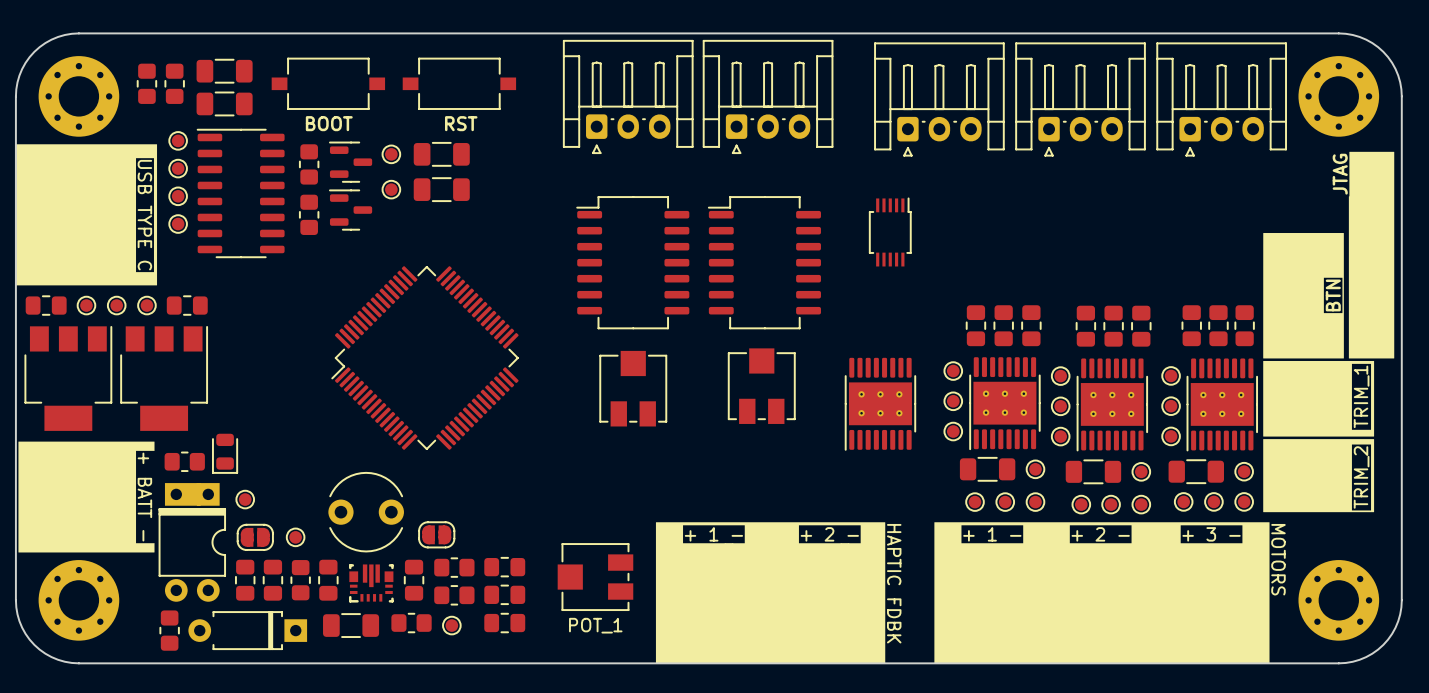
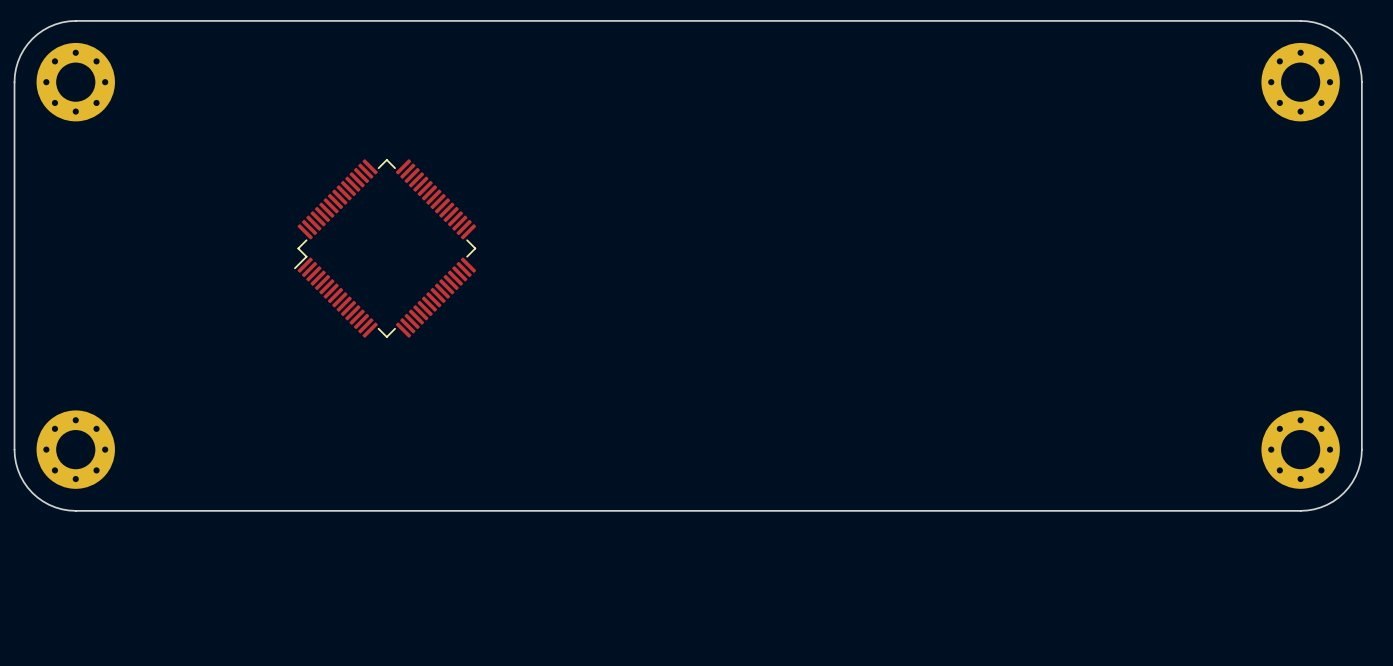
part: (224, 71) -> none
part: (146, 83) -> none
part: (174, 83) -> none
part: (328, 83) -> none
part: (459, 83) -> none
part: (628, 96) -> none
part: (768, 96) -> none
part: (939, 99) -> none
part: (1080, 99) -> none
part: (1221, 99) -> none
part: (224, 103) -> none
text: BOOT (329, 123) -> none
text: RST (461, 123) -> none
part: (178, 140) -> none
drawing: [15, 144, 158, 286] -> none
drawing: [934, 151, 1395, 664] -> none
part: (391, 154) -> none
part: (441, 154) -> none
part: (350, 162) -> none
part: (309, 164) -> none
part: (178, 168) -> none
text: JTAG (1340, 174) -> none
part: (391, 189) -> none
part: (441, 189) -> none
part: (240, 193) -> none
part: (178, 196) -> none
part: (350, 210) -> none
part: (309, 214) -> none
text: USB TYPE C (144, 215) -> none
part: (178, 224) -> none
part: (890, 231) -> none
part: (632, 262) -> none
part: (764, 262) -> none
text: BTN (1333, 295) -> none
part: (46, 305) -> none
part: (86, 305) -> none
part: (116, 305) -> none
part: (146, 305) -> none
part: (187, 305) -> none
part: (975, 325) -> none
part: (1003, 325) -> none
part: (1031, 325) -> none
part: (1191, 325) -> none
part: (1218, 325) -> none
part: (1244, 325) -> none
part: (1085, 326) -> none
part: (1113, 326) -> none
part: (1141, 326) -> none
part position: (425, 358) -> (385, 248)
part: (953, 371) -> none
part: (1171, 375) -> none
part: (1060, 376) -> none
part: (68, 378) -> none
part: (164, 378) -> none
part: (761, 386) -> none
part: (633, 388) -> none
text: TRIM_1 (1361, 396) -> none
part: (953, 401) -> none
part: (1004, 403) -> none
part: (880, 404) -> none
part: (1112, 404) -> none
part: (1222, 404) -> none
part: (1060, 406) -> none
part: (1171, 406) -> none
part: (953, 431) -> none
part: (1060, 436) -> none
part: (1171, 436) -> none
drawing: [18, 441, 155, 553] -> none
part: (225, 453) -> none
part: (184, 461) -> none
part: (987, 469) -> none
part: (1035, 469) -> none
part: (1093, 471) -> none
part: (1141, 471) -> none
part: (1196, 471) -> none
part: (1244, 471) -> none
board edge: (15, 474) (15, 600) (19, 621) (29, 639) (45, 653) (64, 661) (78, 663) (1345, 662) (1359, 659) (1378, 649) (1392, 633) (1398, 621) (1401, 600) (1401, 474) -> (14, 449) (16, 463) (20, 476) (32, 492) (43, 501) (55, 507) (75, 510) (1300, 510) (1314, 509) (1327, 504) (1343, 492) (1352, 482) (1358, 469) (1361, 449)
text: TRIM_2 (1361, 477) -> none
text: + BATT - (144, 497) -> none
part: (245, 499) -> none
part: (1183, 501) -> none
part: (1213, 501) -> none
part: (1244, 501) -> none
part: (975, 502) -> none
part: (1005, 502) -> none
part: (1035, 502) -> none
part: (1081, 504) -> none
part: (1111, 504) -> none
part: (1141, 504) -> none
part: (366, 512) -> none
drawing: [655, 522, 886, 664] -> none
part: (436, 534) -> none
text: + 1 - (713, 534) -> none
text: + 2 - (829, 534) -> none
text: + 1 - (992, 534) -> none
text: + 2 - (1100, 534) -> none
text: + 3 - (1211, 534) -> none
part: (255, 537) -> none
part: (295, 537) -> none
part: (192, 542) -> none
text: MOTORS (1278, 559) -> none
part: (454, 567) -> none
part: (504, 567) -> none
part: (595, 577) -> none
part: (245, 580) -> none
part: (272, 580) -> none
part: (300, 580) -> none
part: (328, 580) -> none
part: (414, 580) -> none
part: (371, 583) -> none
text: HAPTIC FDBK (894, 583) -> none
part: (504, 594) -> none
part: (454, 595) -> none
part position: (78, 600) -> (75, 449)
part position: (1338, 600) -> (1300, 449)
part: (411, 623) -> none
part: (504, 623) -> none
part: (351, 625) -> none
part: (451, 625) -> none
text: POT_1 (595, 625) -> none
part: (169, 630) -> none
part: (247, 630) -> none

